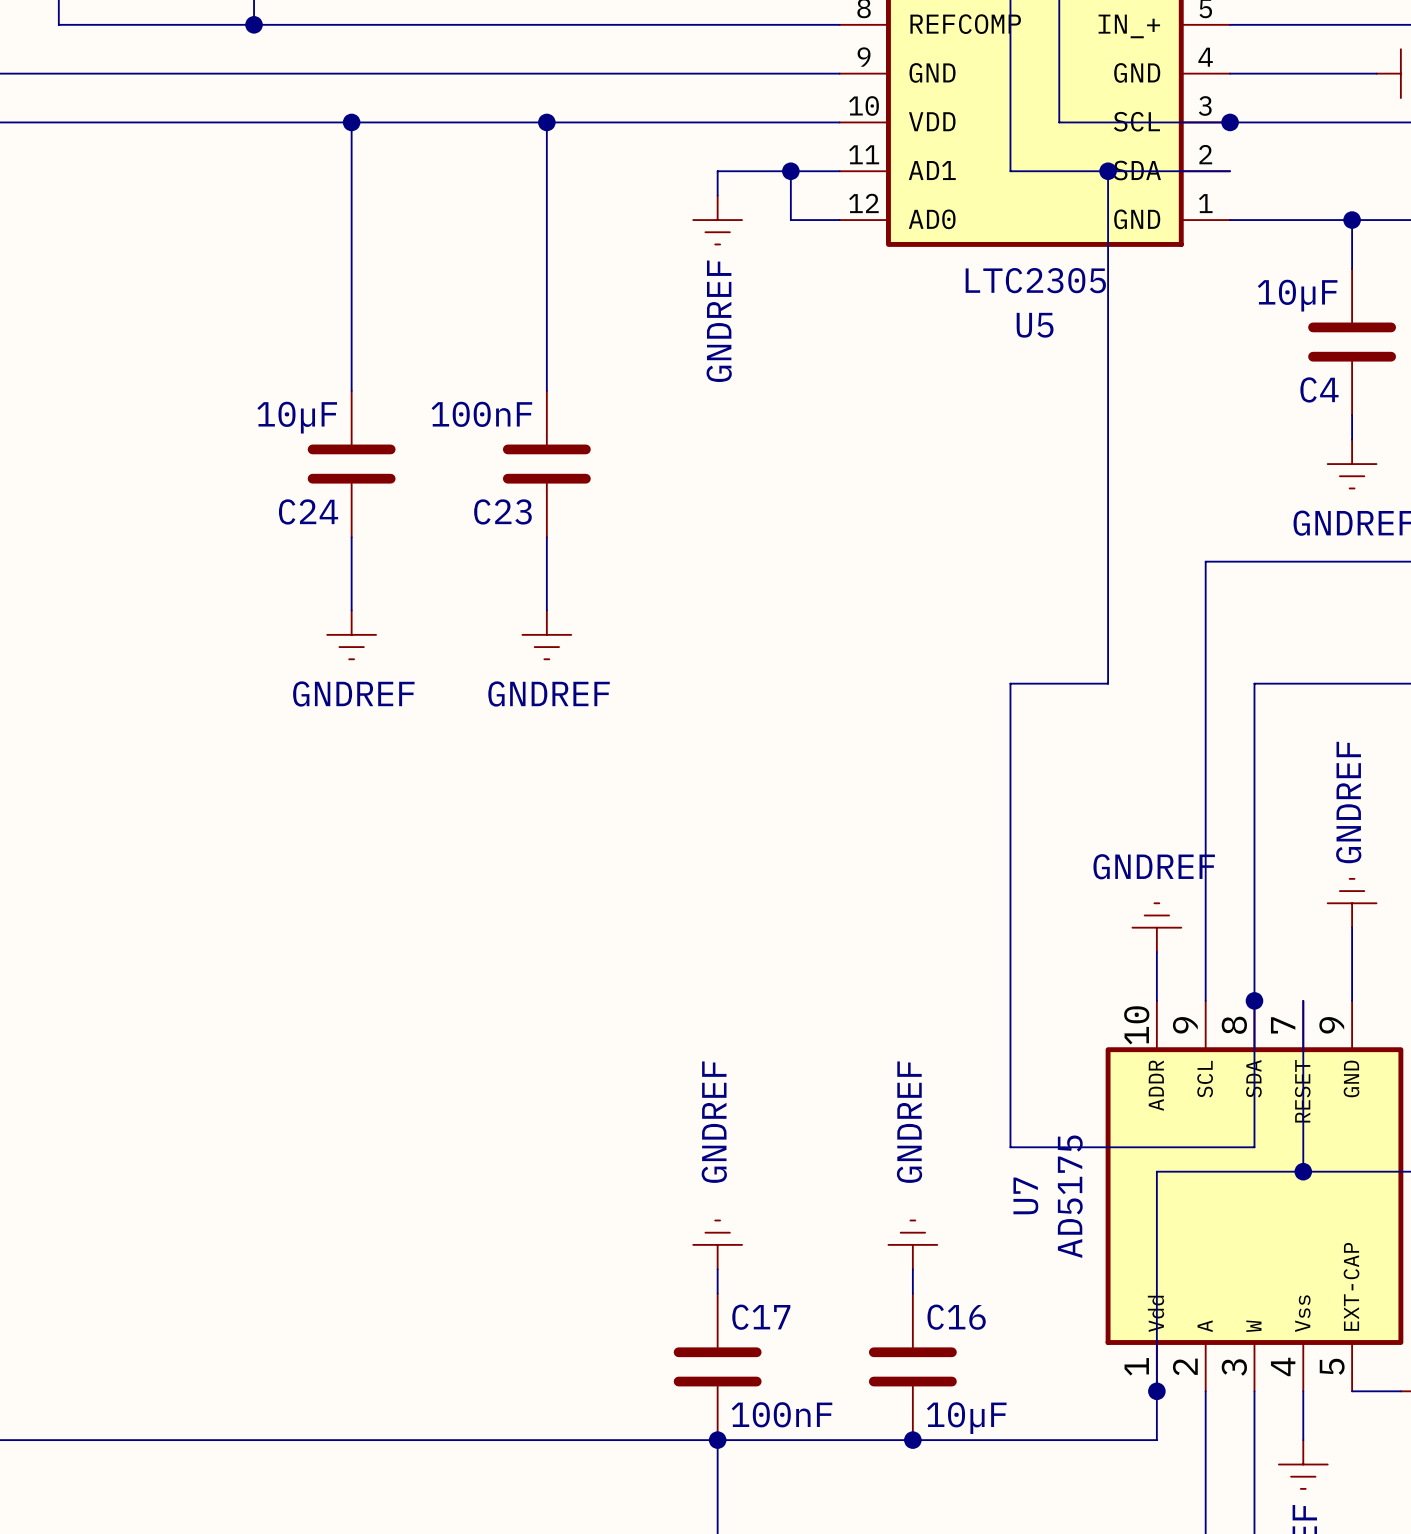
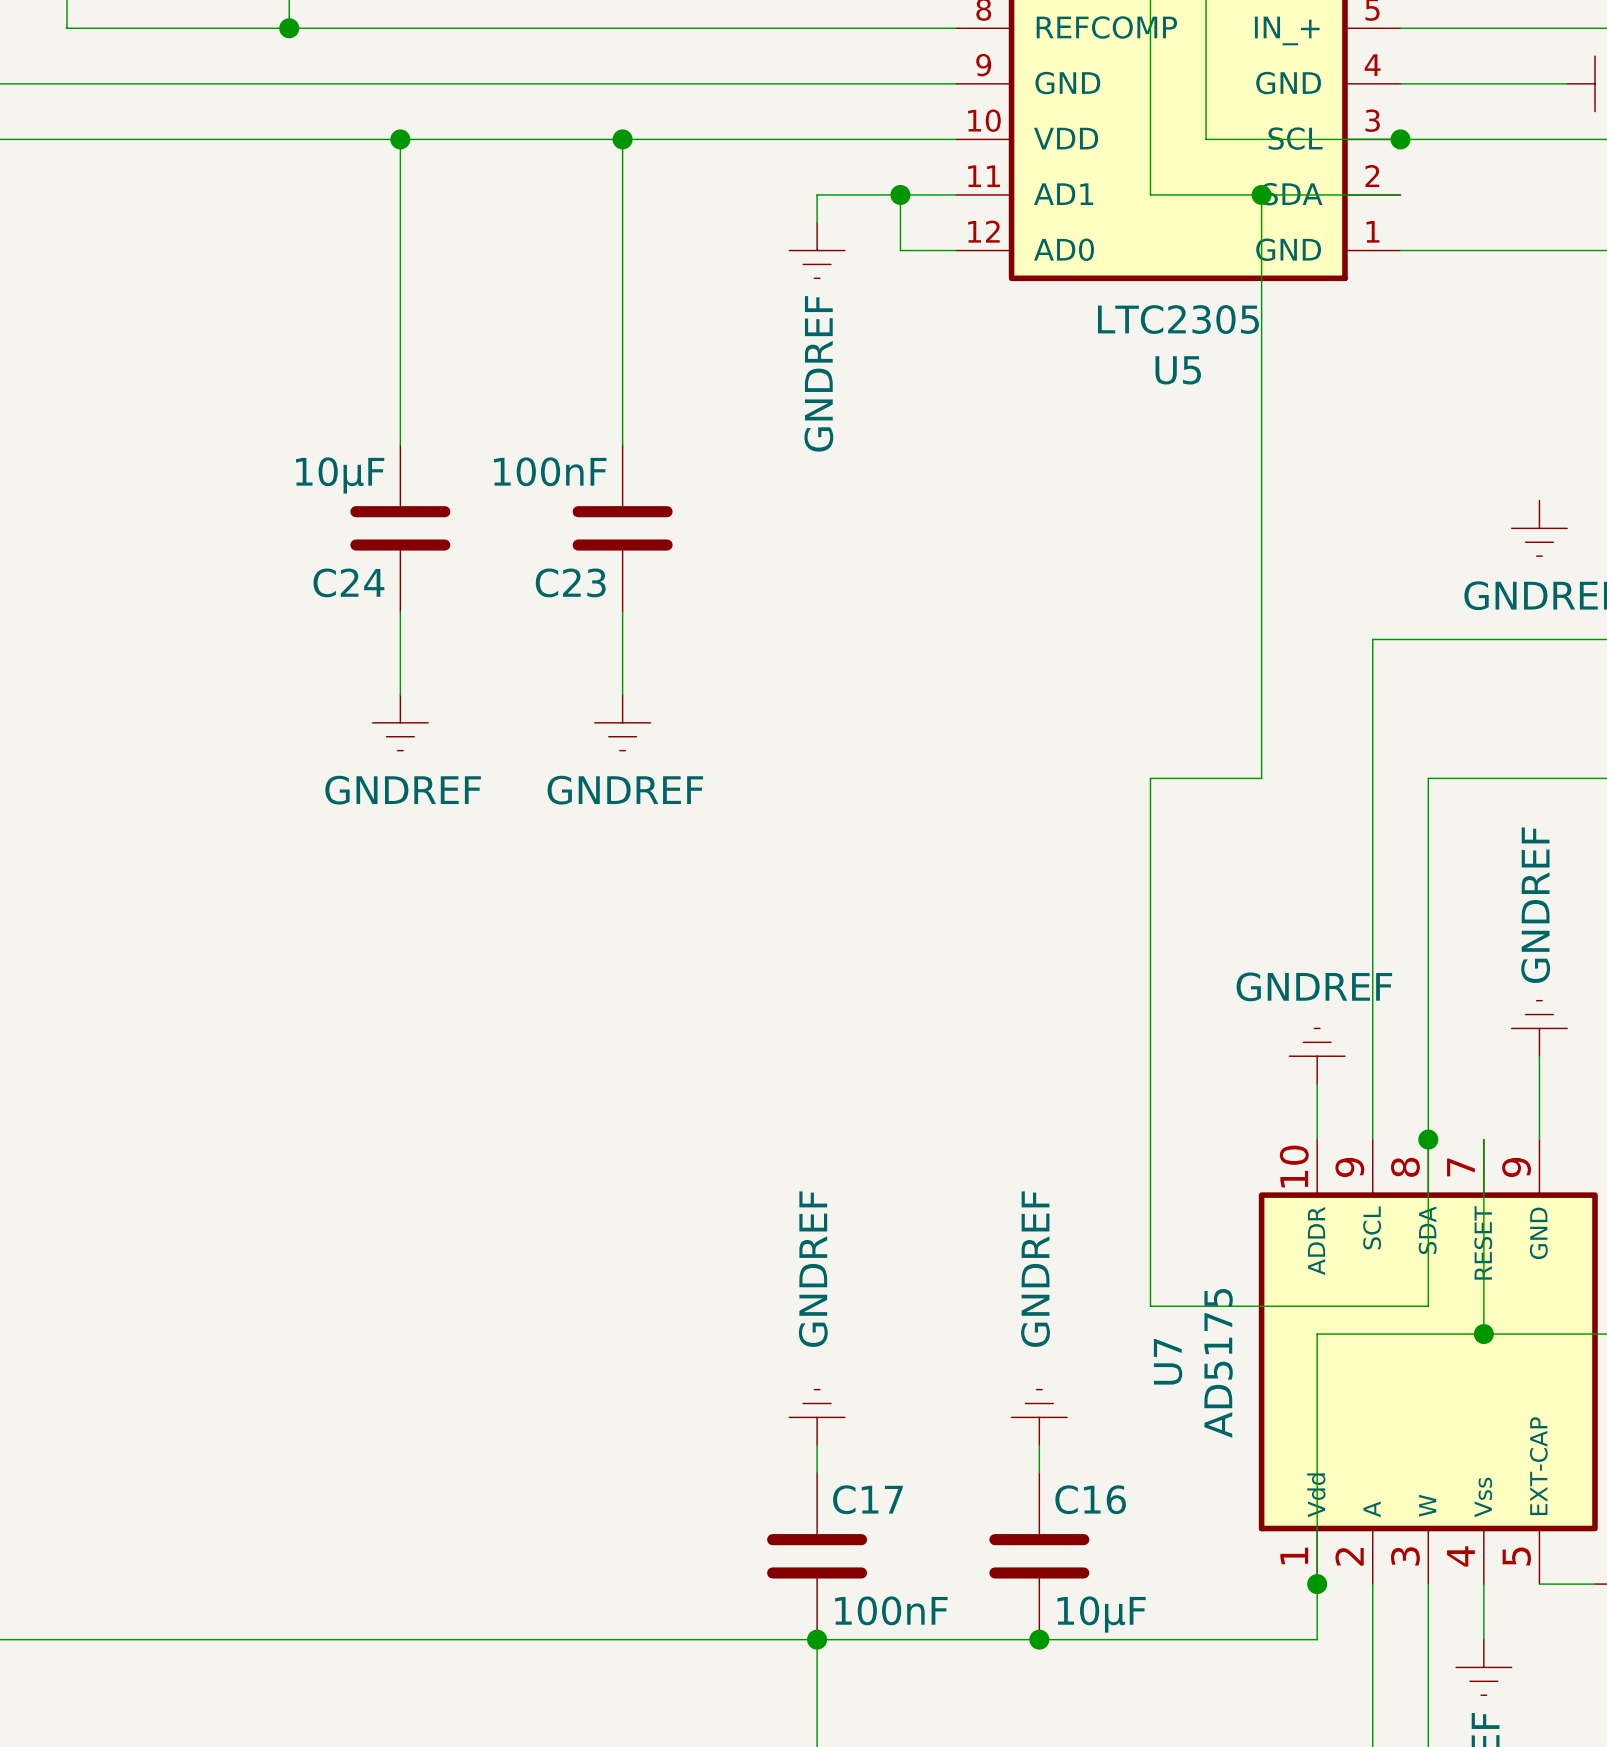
wire: (1352, 220) (1352, 268) -> none
junction: (1352, 220) -> none
C4: 10µF (1352, 342) -> none
wire: (1352, 415) (1352, 439) -> none

